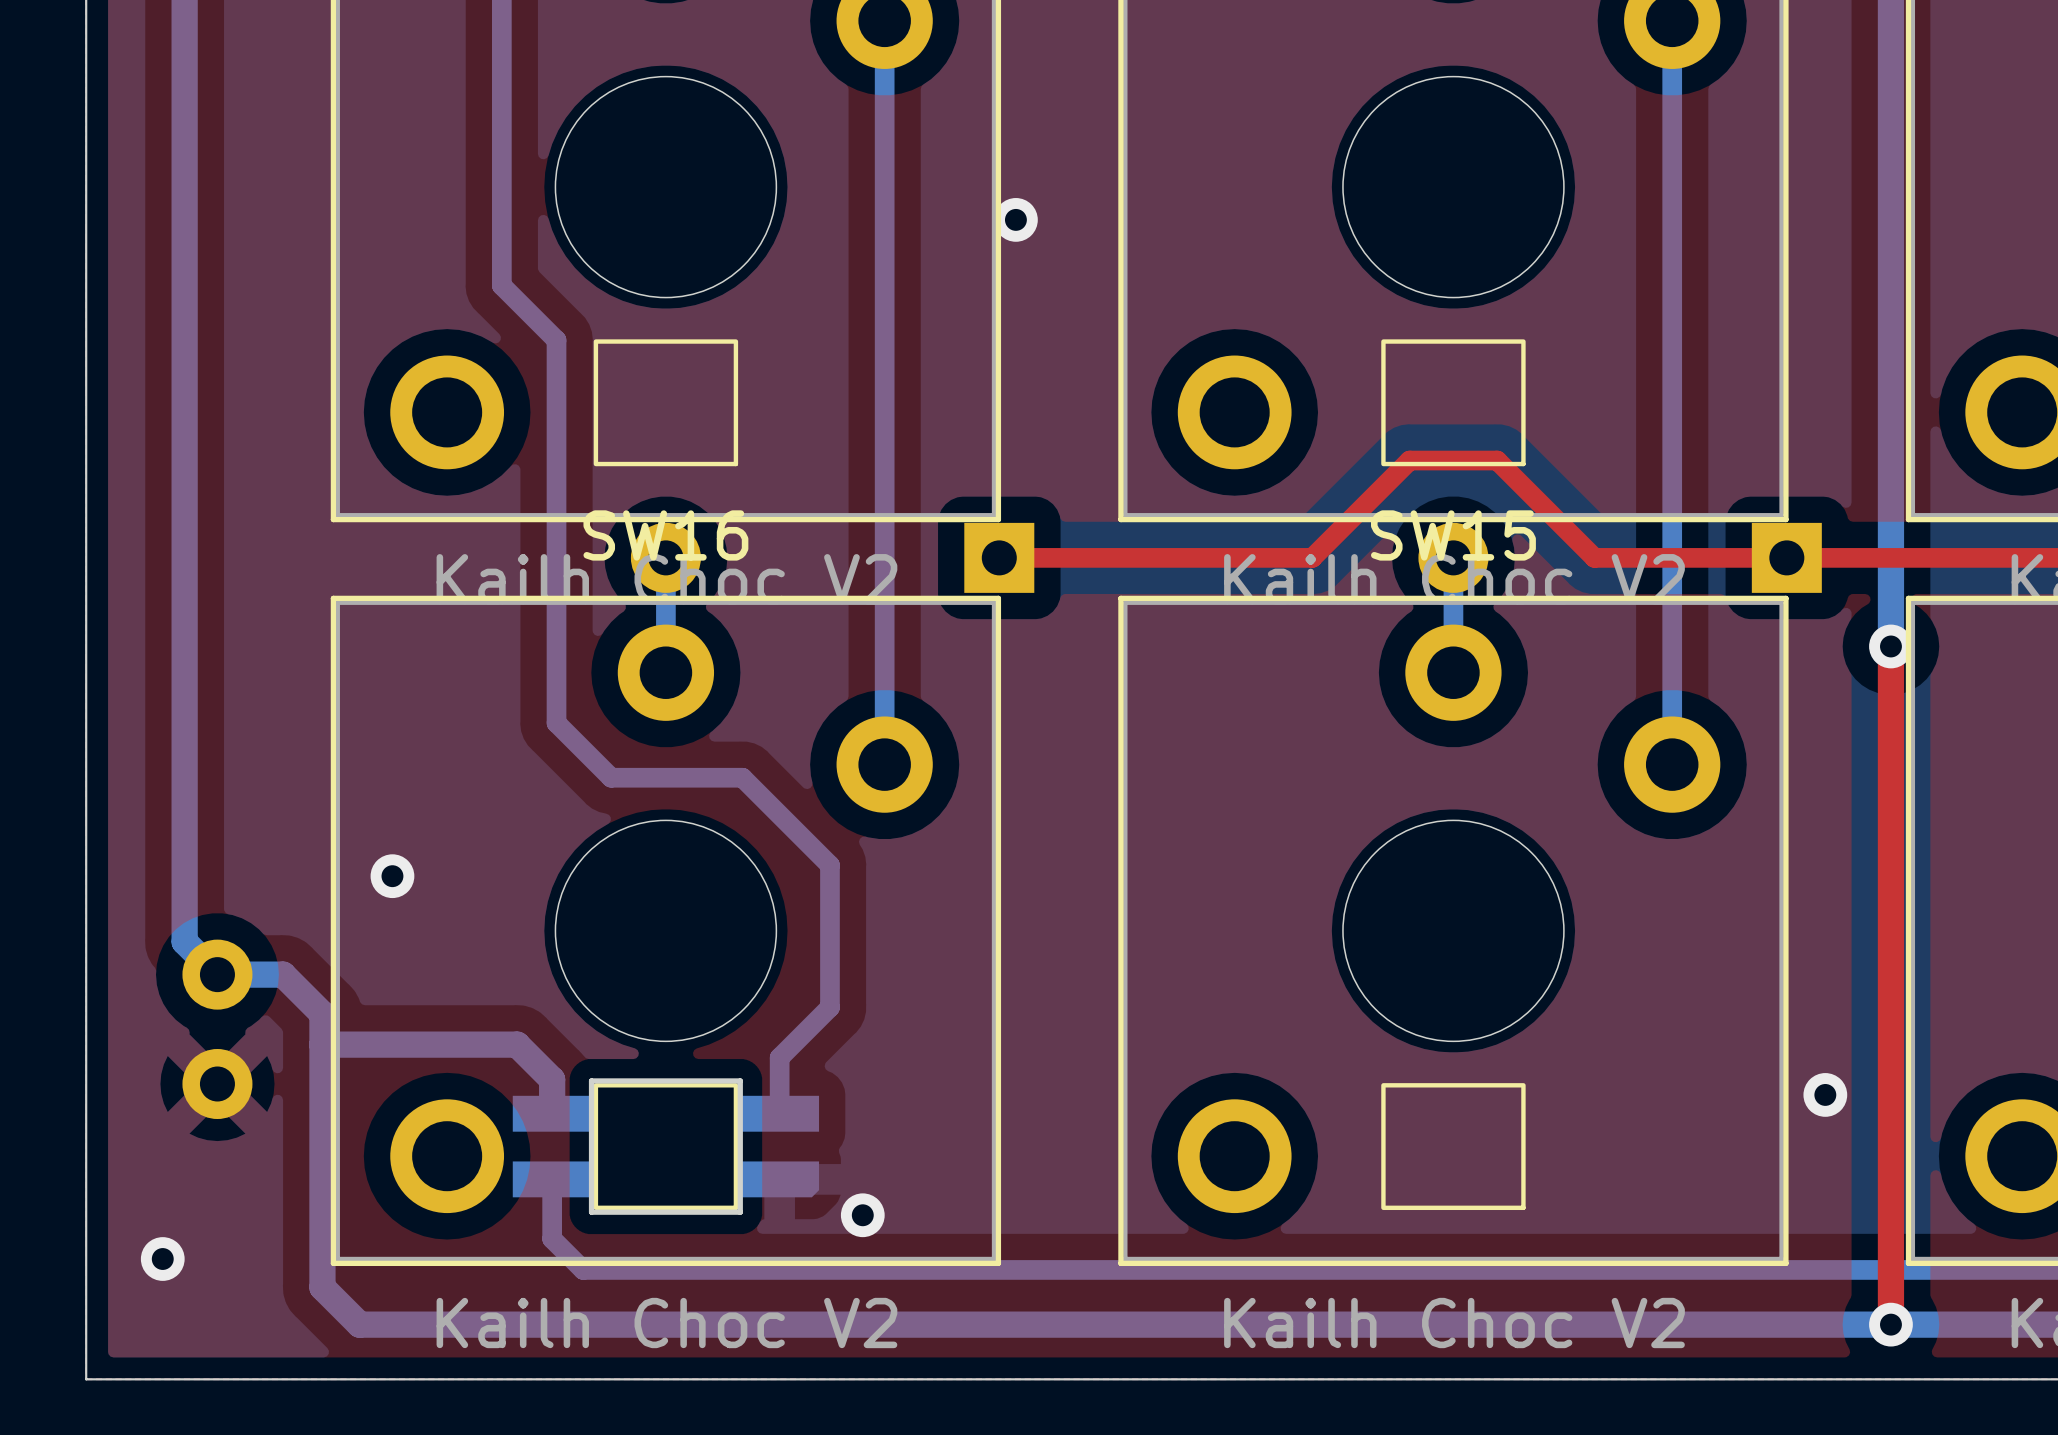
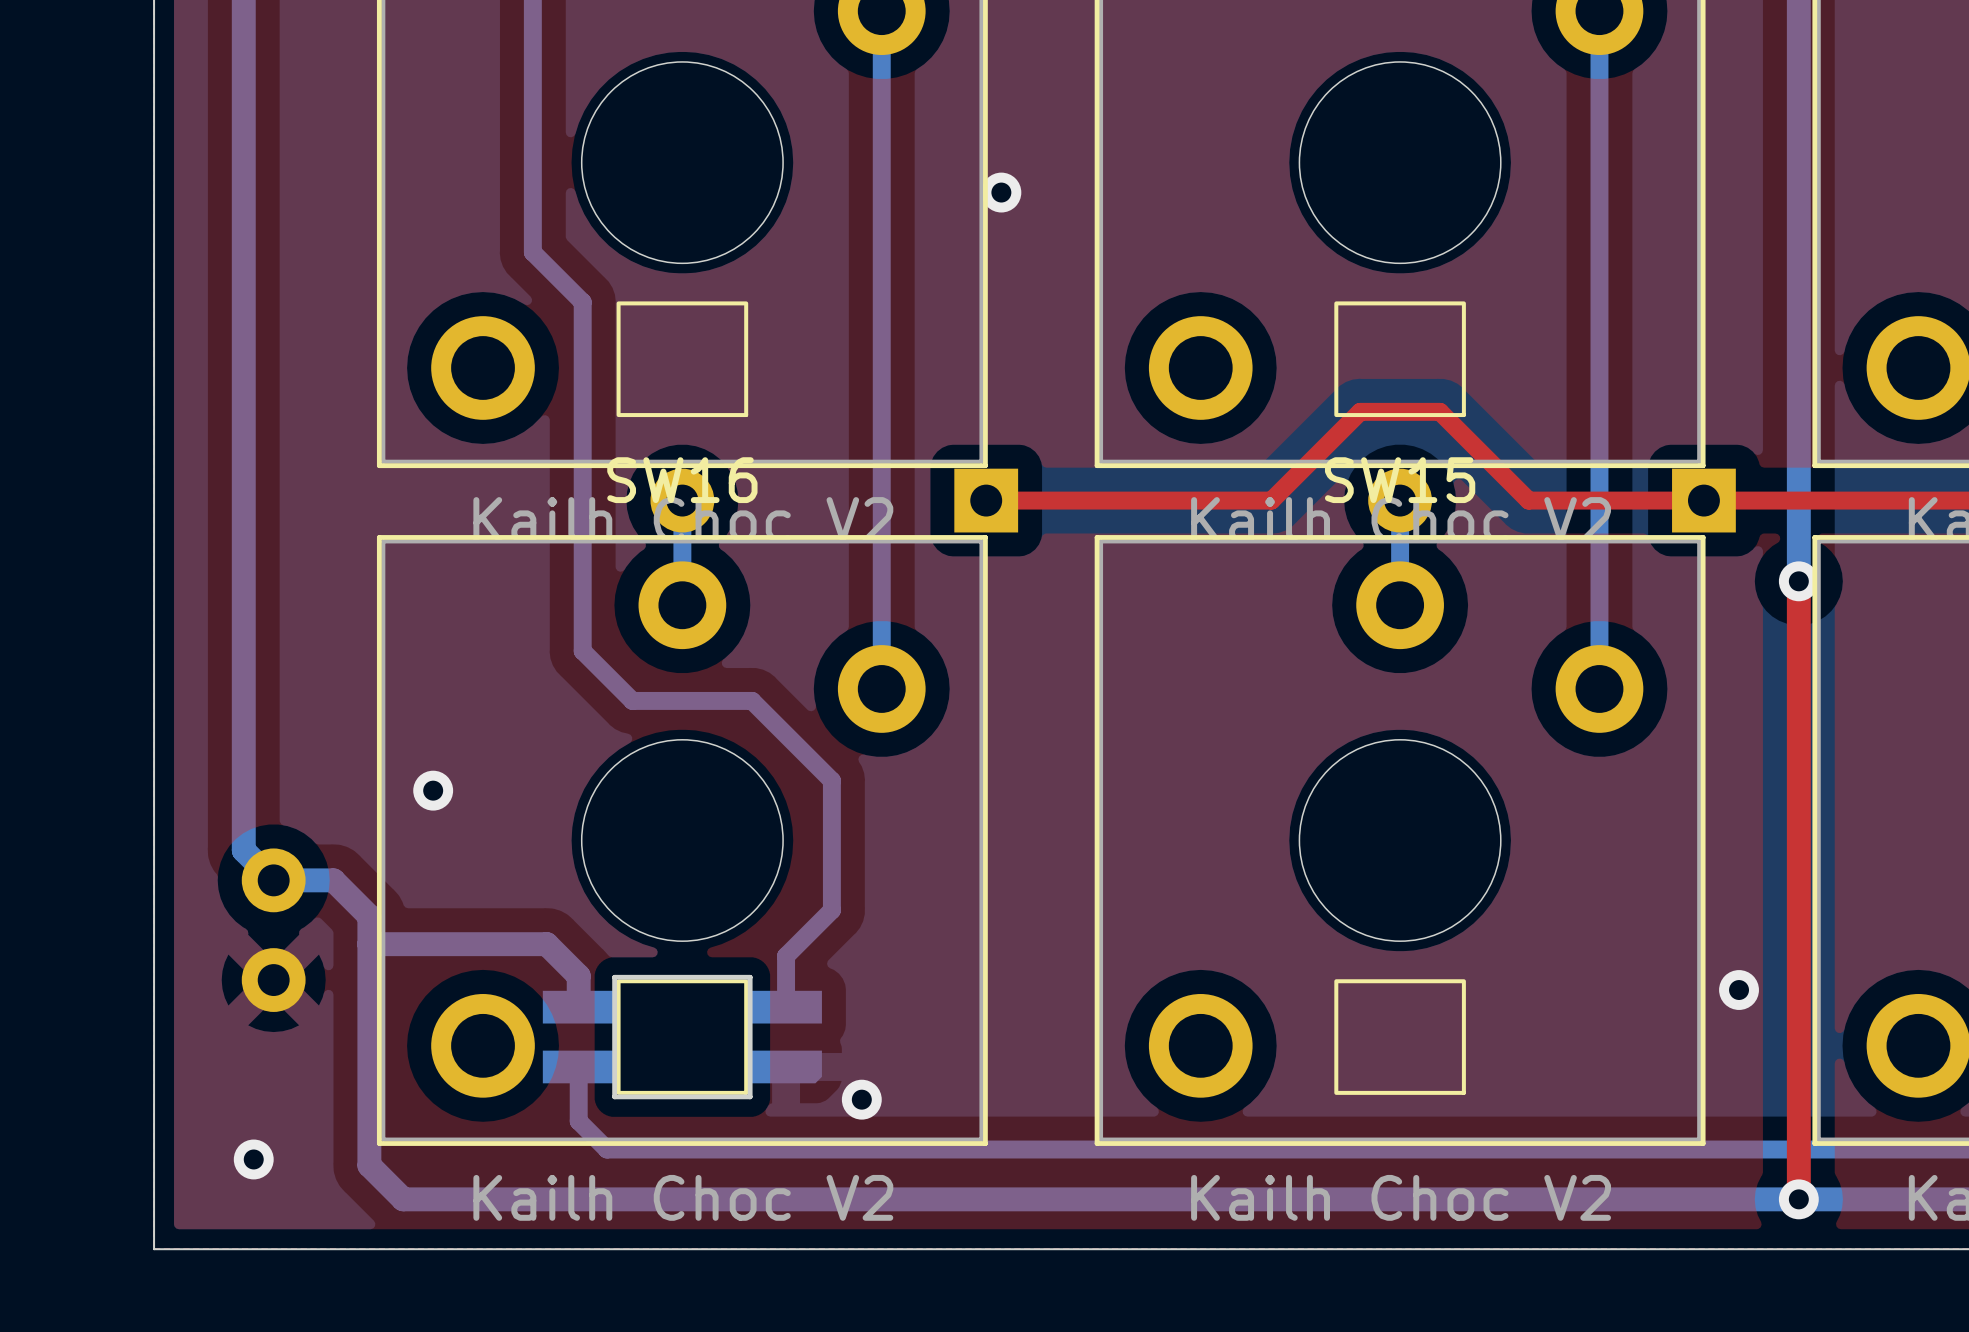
via position: (162, 1259) -> (253, 1159)

